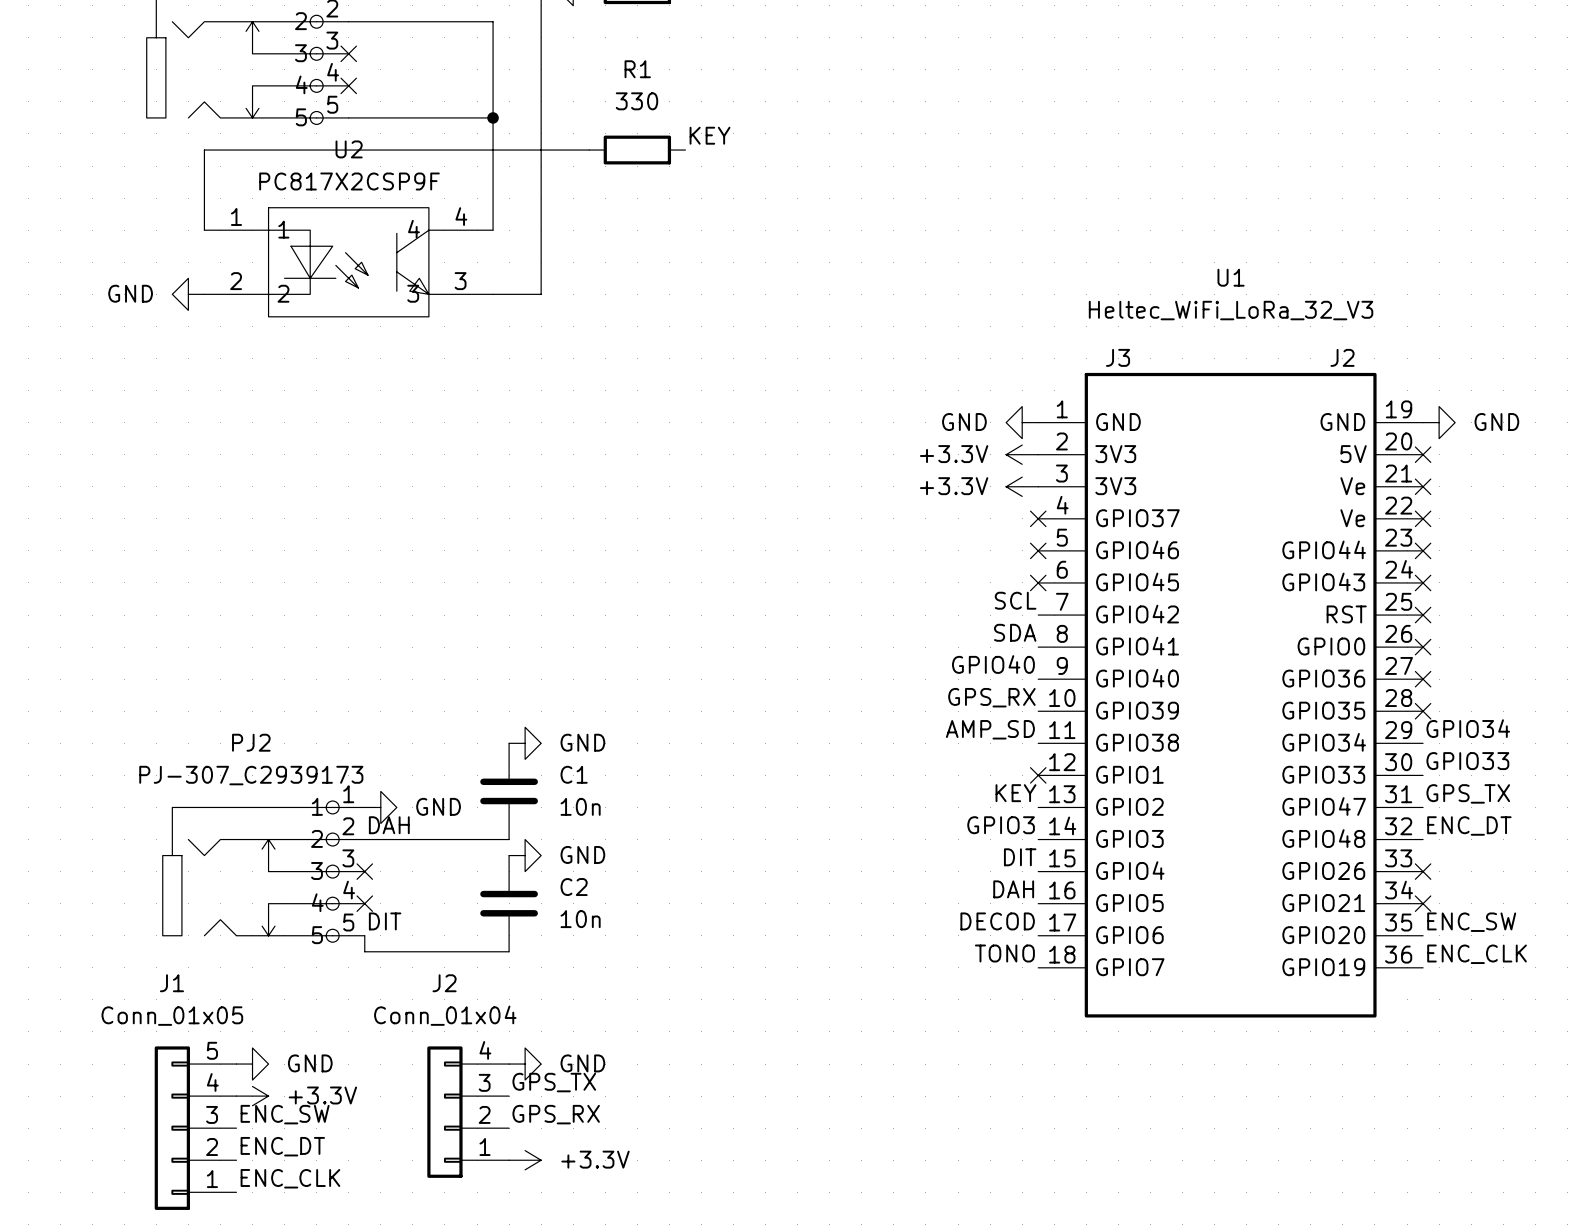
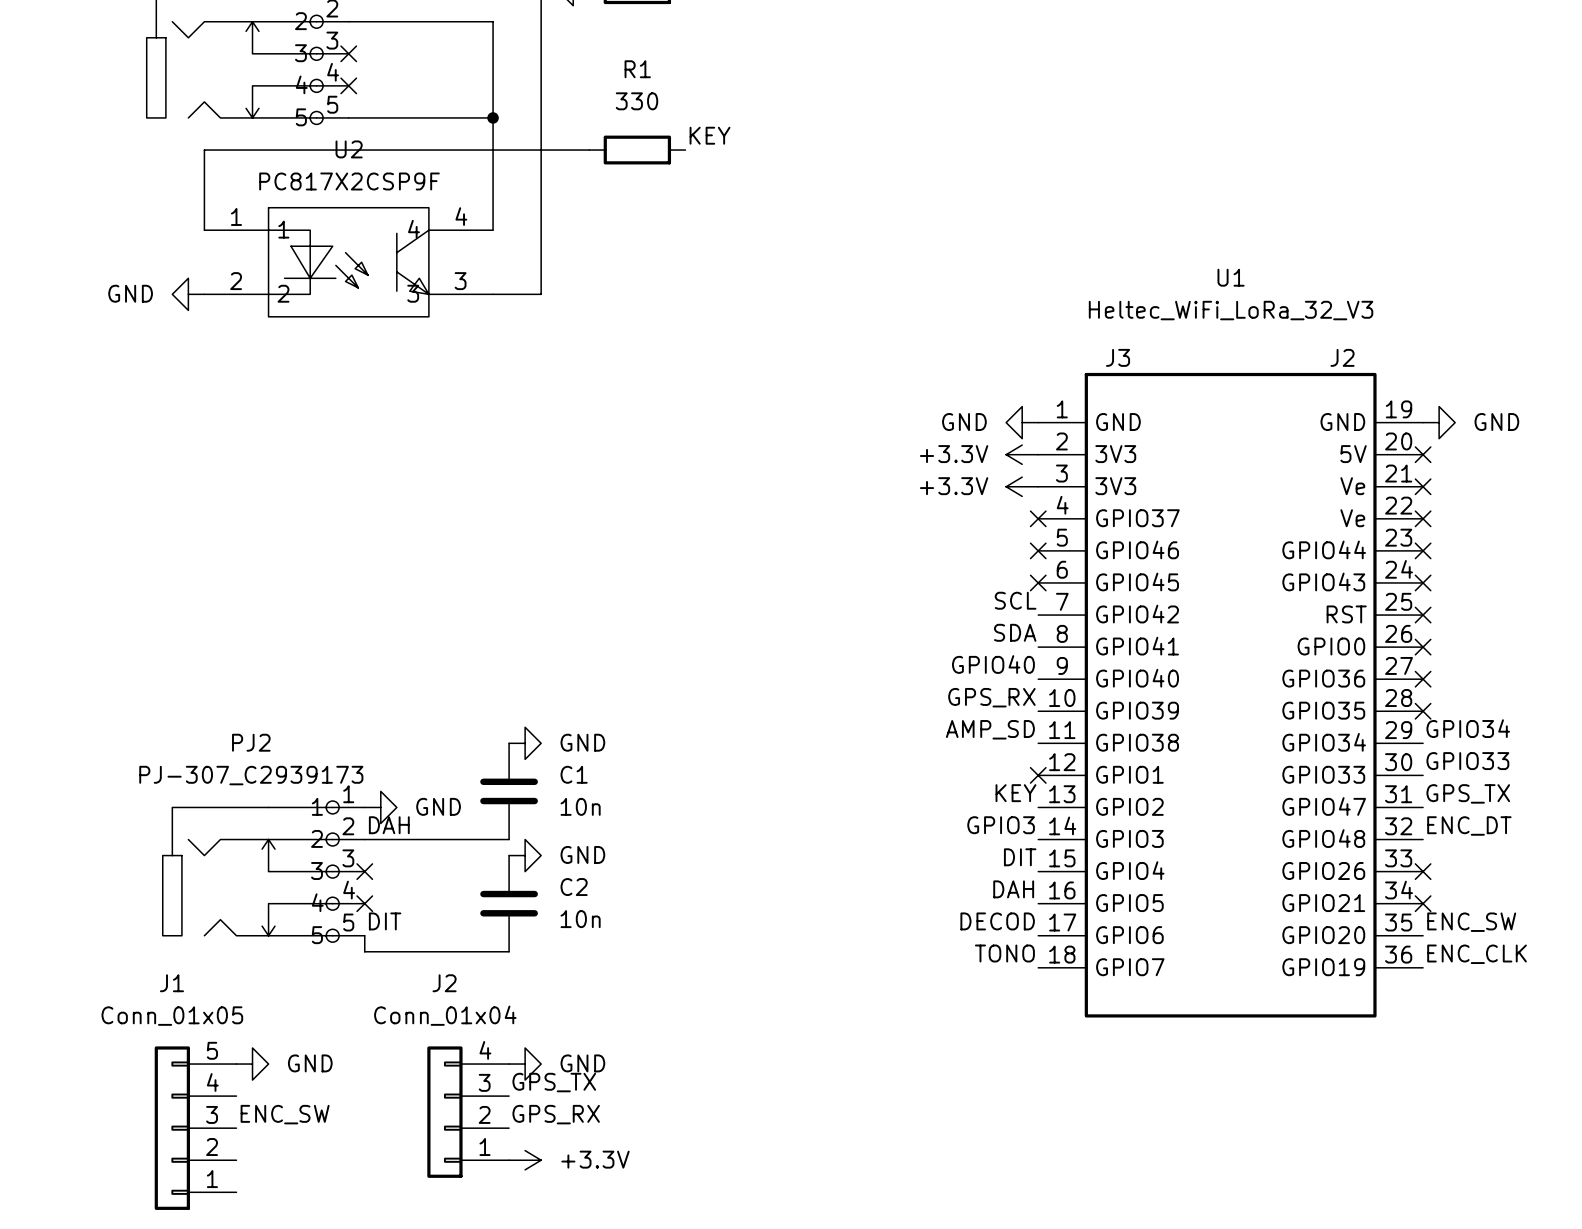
power symbol: +3.3V (252, 1096) -> none
label: ENC_DT (282, 1146) -> none
label: ENC_CLK (290, 1178) -> none

